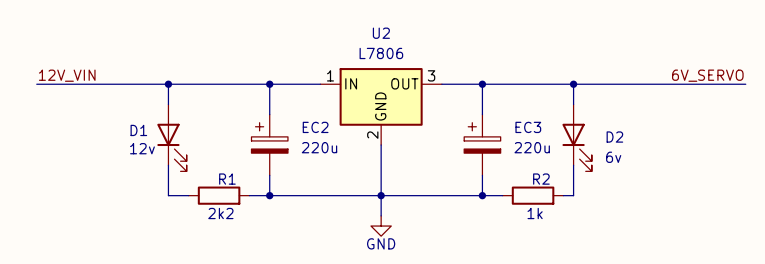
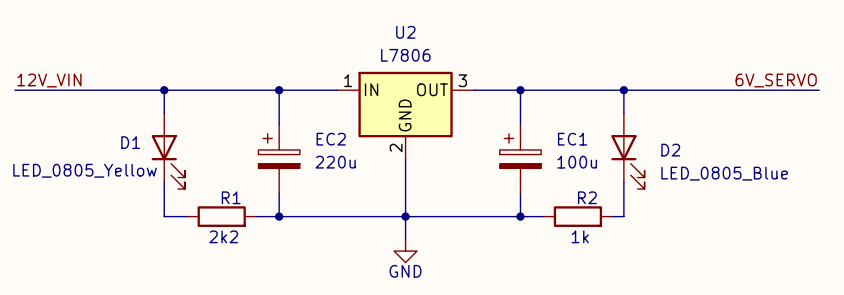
EC3 name: EC3 (528, 127) -> EC1 (572, 139)
EC3 value: 220u (532, 147) -> 100u (577, 162)
D1 value: 12v (142, 148) -> LED_0805_Yellow (85, 170)
D2 value: 6v (613, 157) -> LED_0805_Blue (724, 173)

